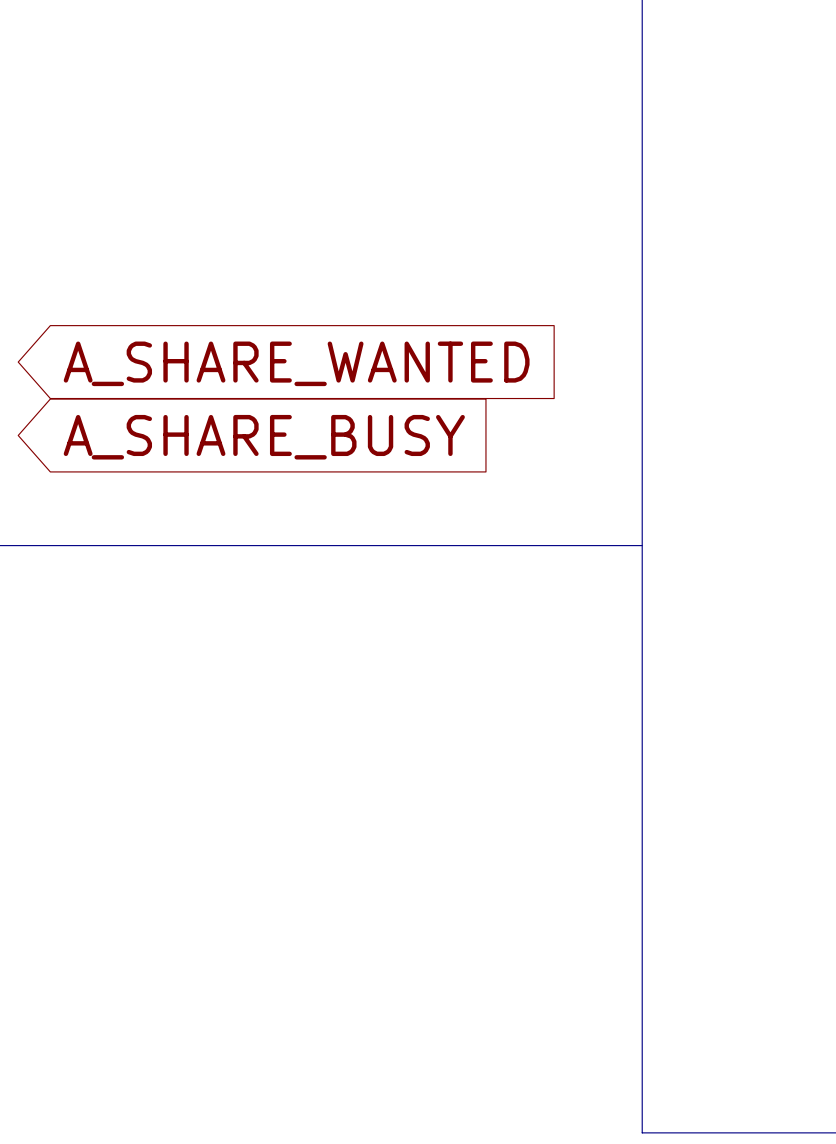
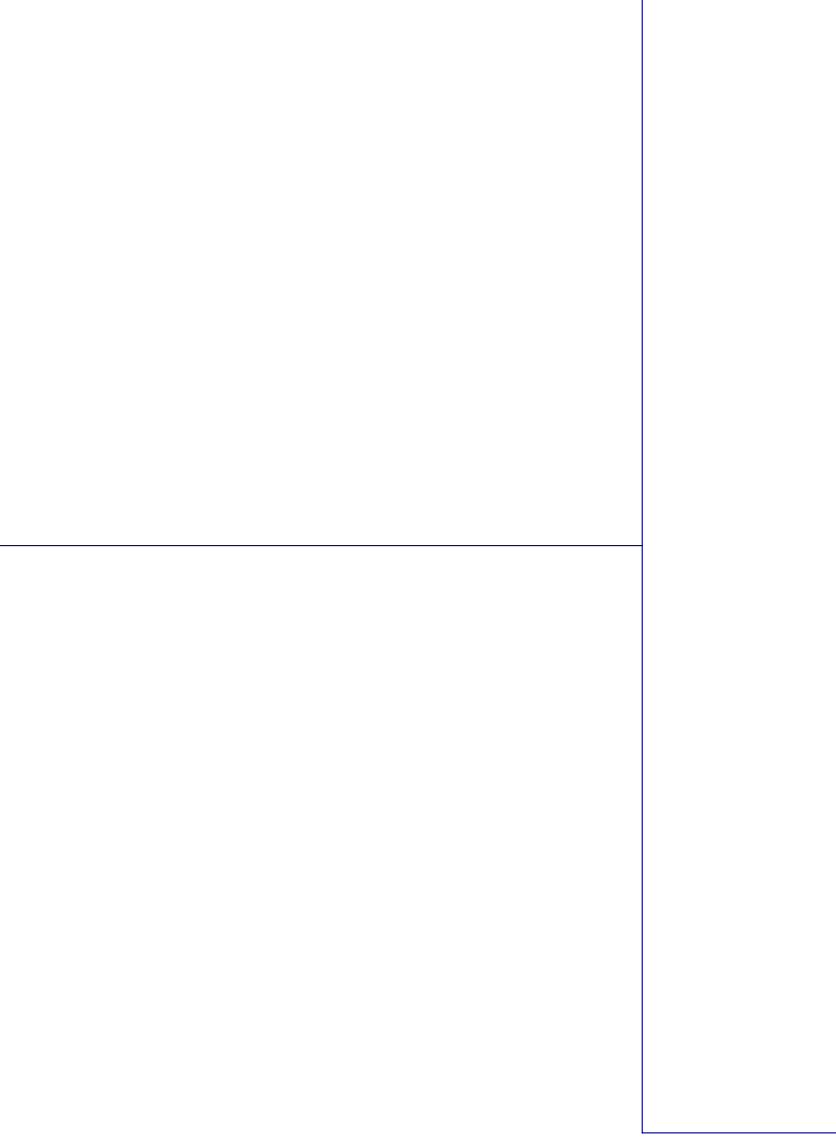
global label: A_SHARE_WANTED (296, 363) -> none
global label: A_SHARE_BUSY (264, 437) -> none

